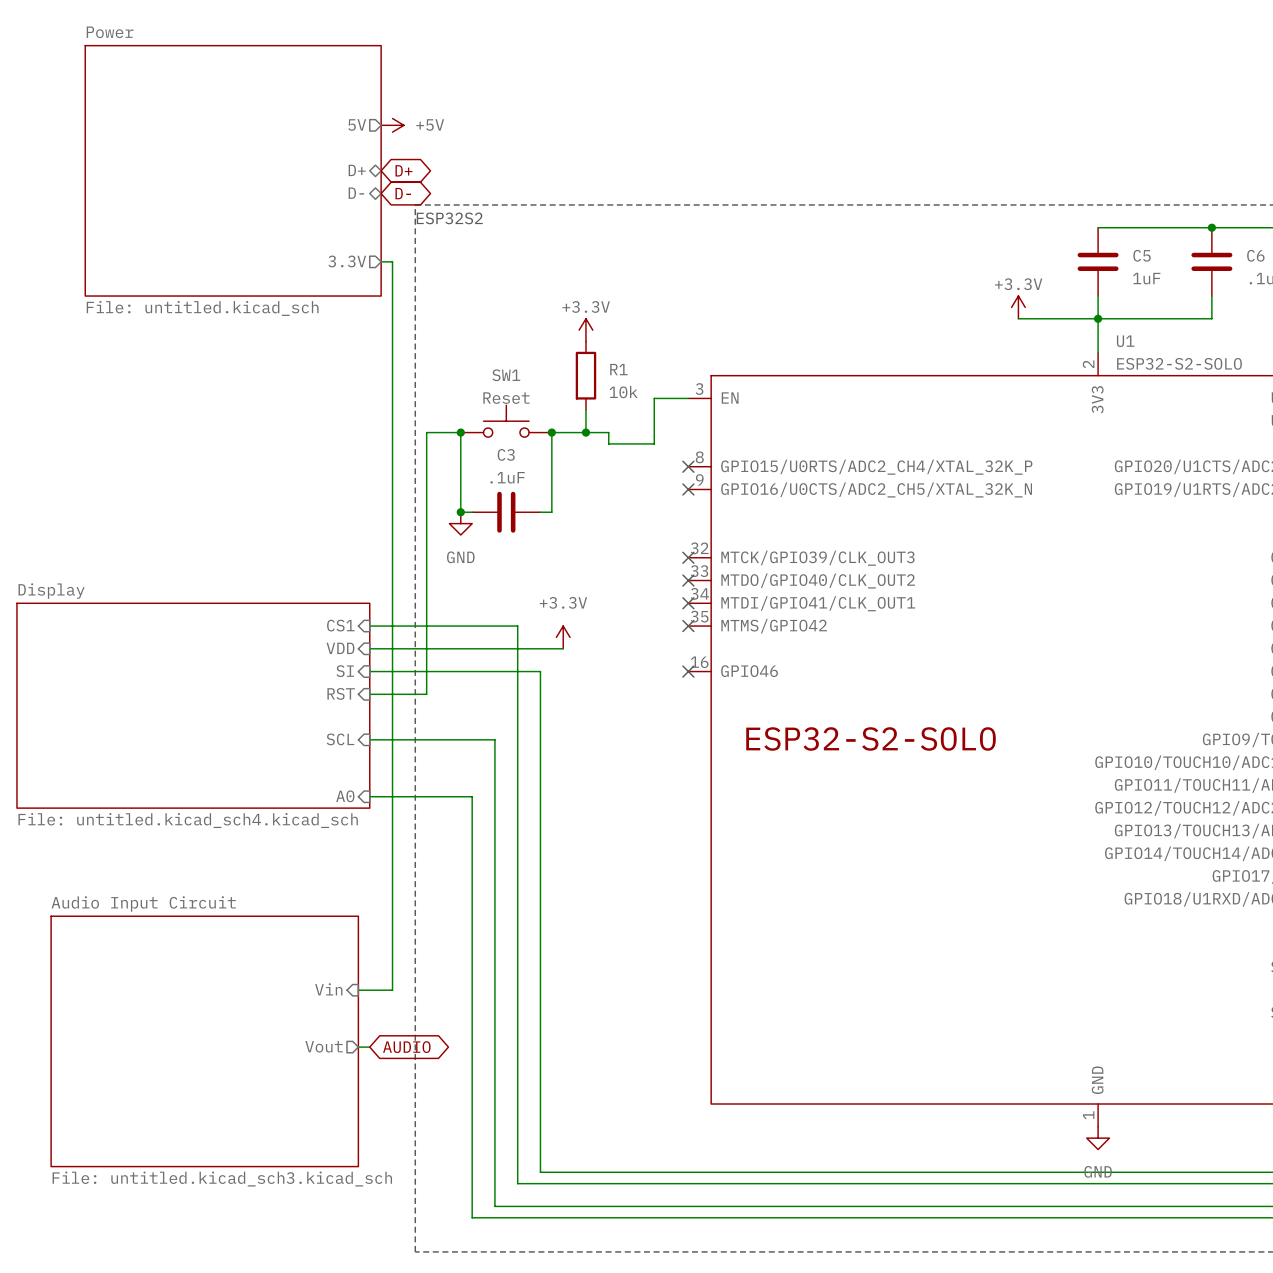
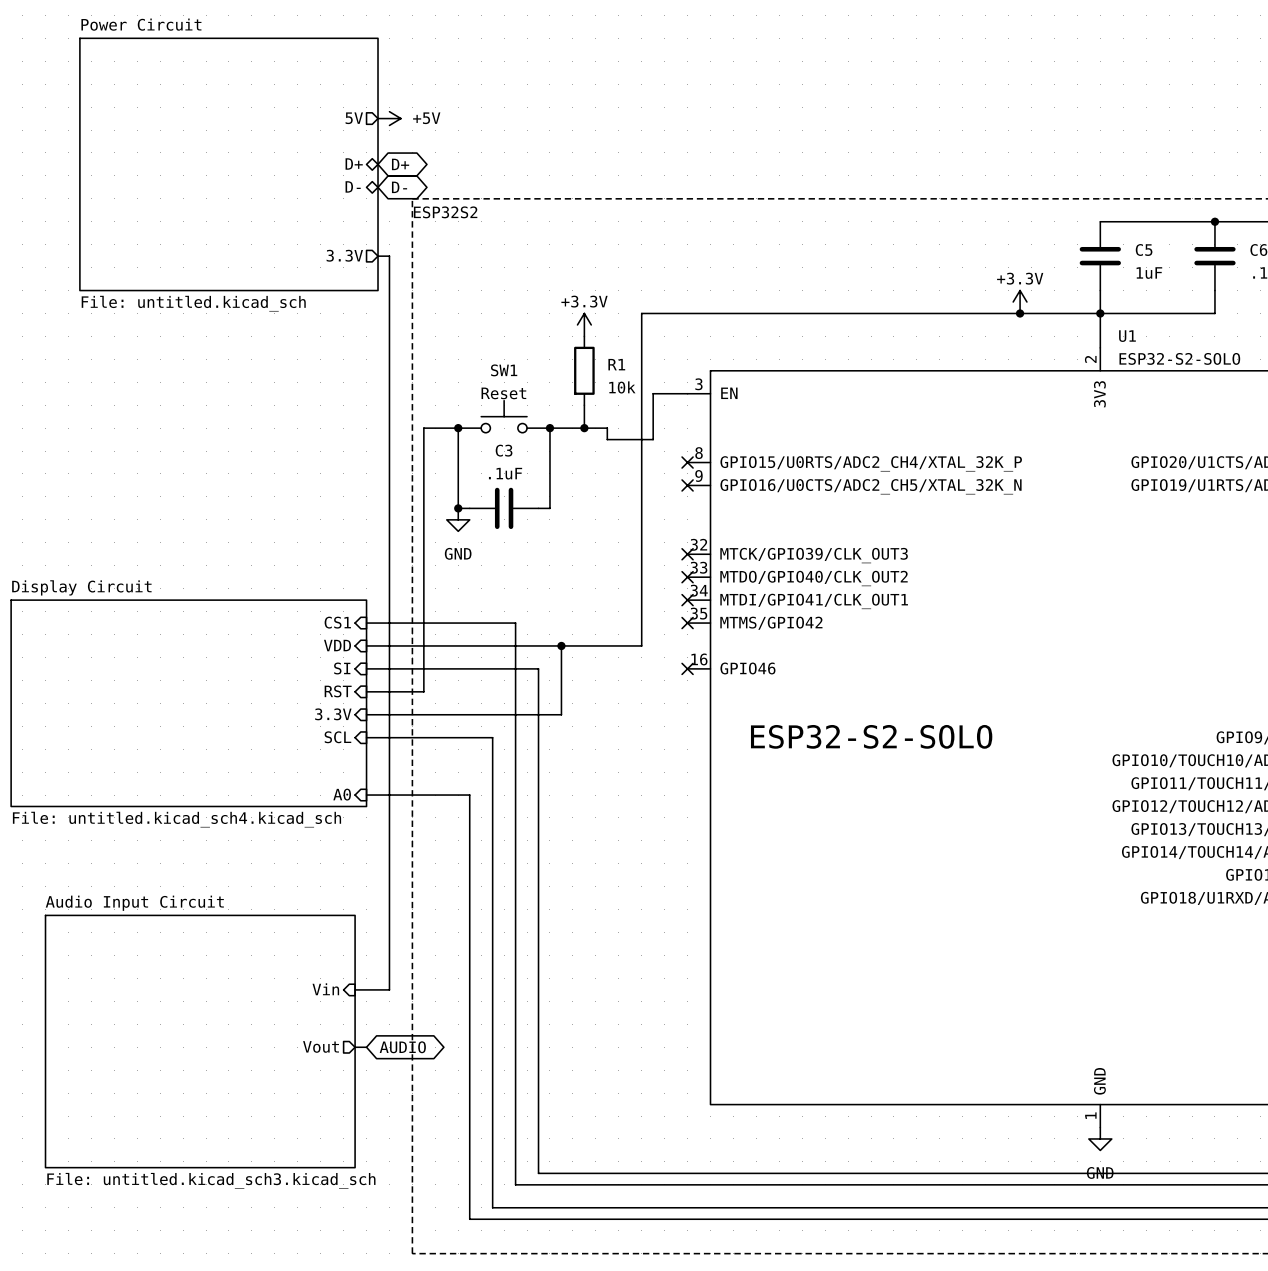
sheet Power name: Power (110, 32) -> Power Circuit (141, 24)
wire: none -> (1020, 313) (641, 313) (641, 645) (561, 645) (561, 714) (366, 714)
junction: none -> (1020, 313)
sheet Display name: Display (51, 591) -> Display Circuit (81, 587)
power symbol: +3.3V (563, 637) -> none
junction: none -> (561, 645)
sheet pin: none -> 3.3V (333, 714)

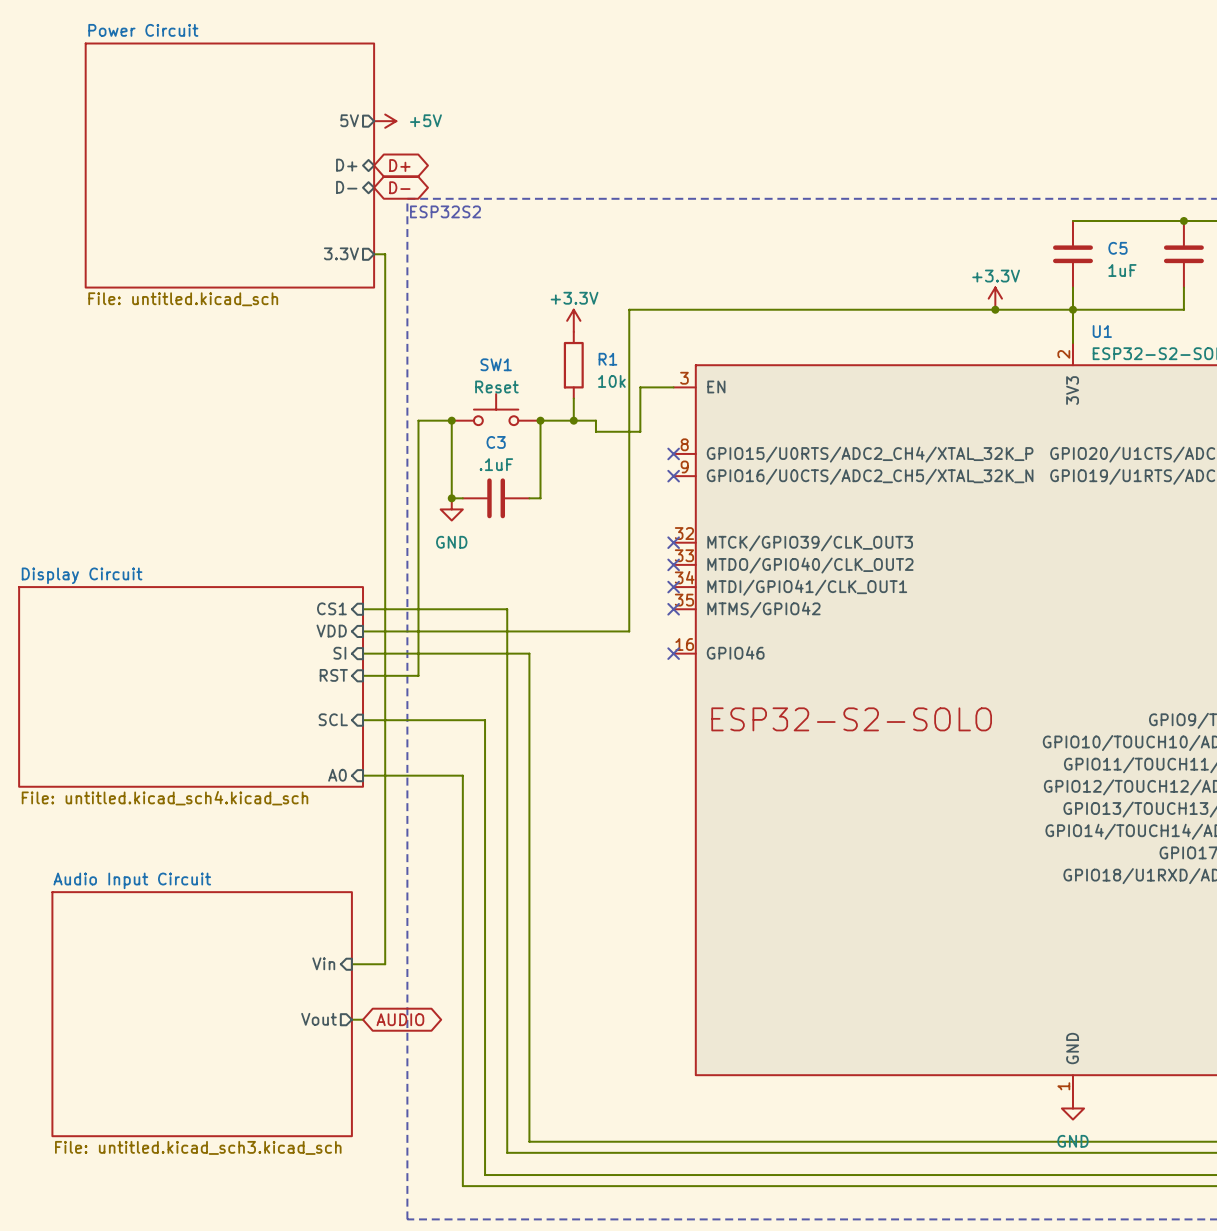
wire: (561, 645) (561, 714) (366, 714) -> none
junction: (561, 645) -> none
sheet pin: 3.3V (333, 714) -> none

